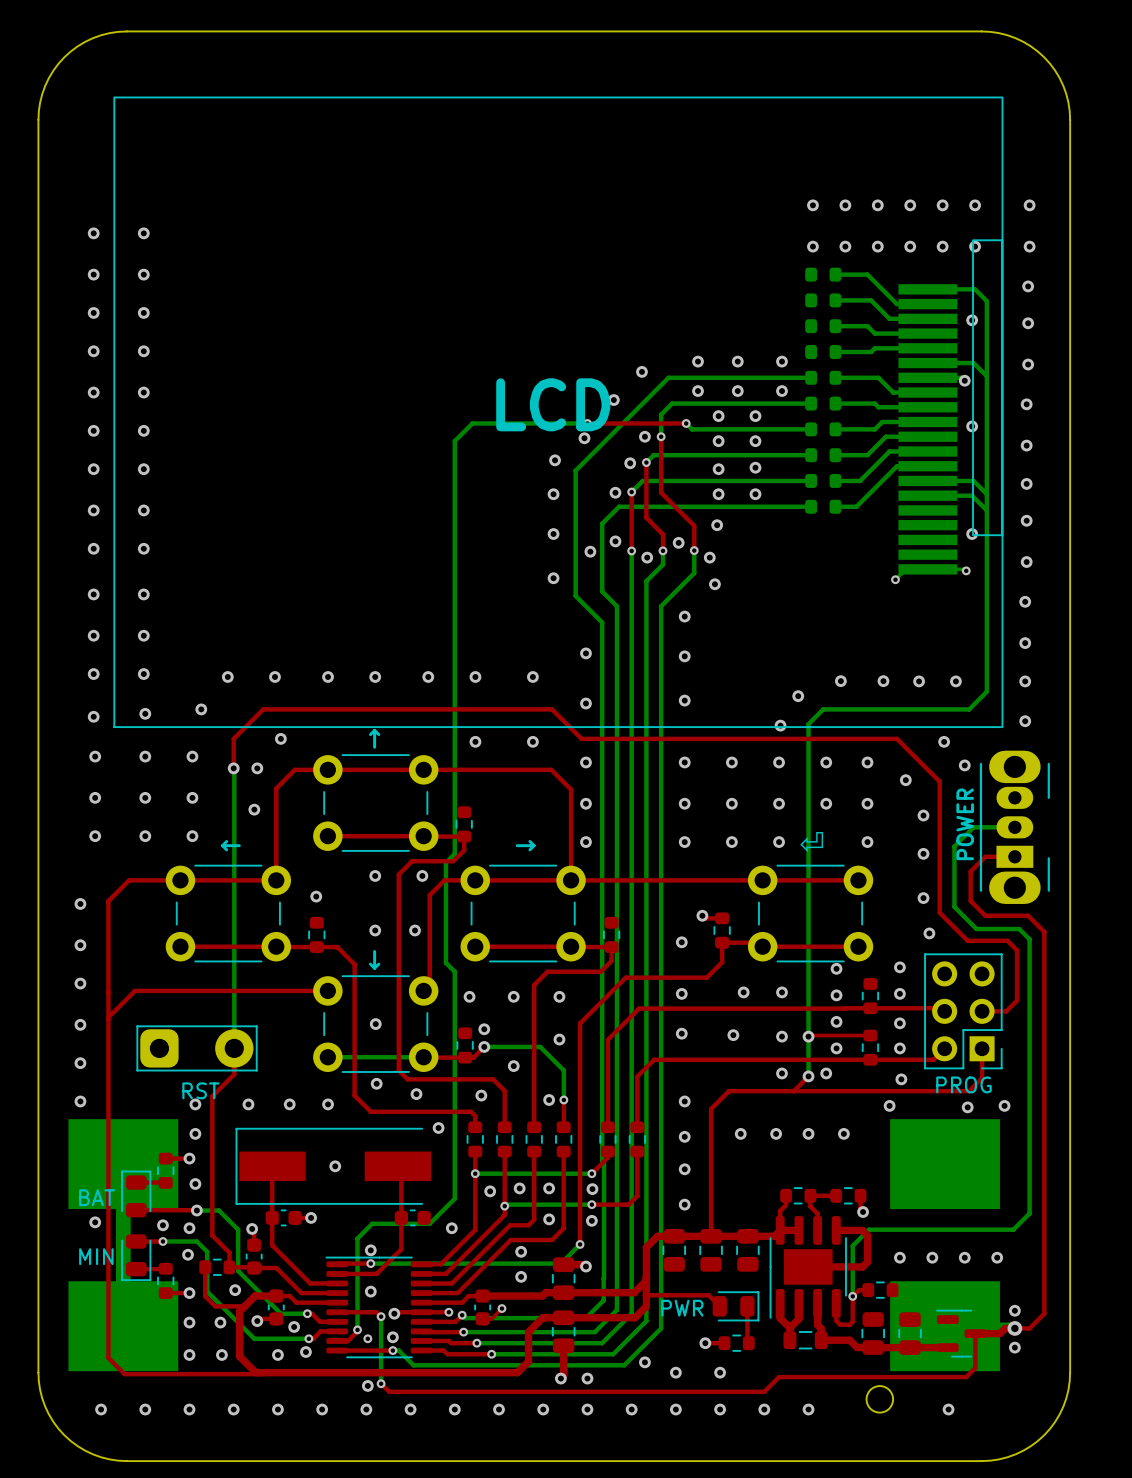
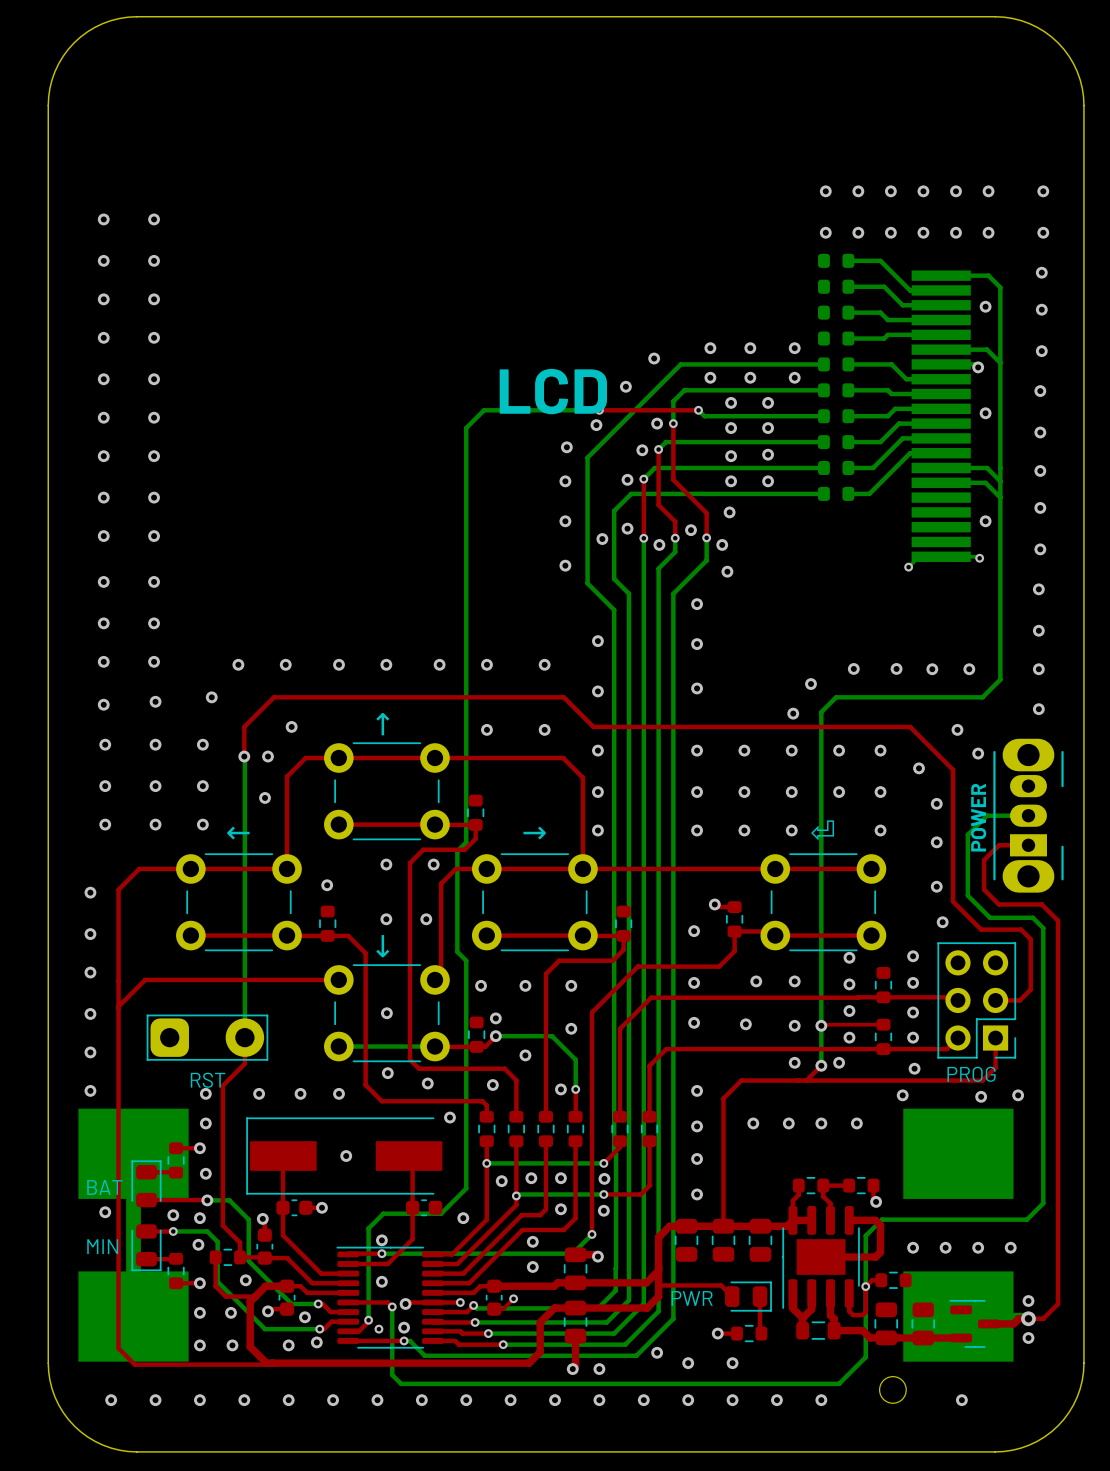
drawing: [113, 96, 1004, 728] -> none
bottom track: none -> (865, 1286) (865, 1357) (839, 1383) (401, 1383) (392, 1374)
top track: (975, 1333) (975, 1367) (966, 1377) (779, 1377) (764, 1391) (389, 1391) (381, 1383) -> none
via: (381, 1383) -> none
via: (367, 1385) -> none

